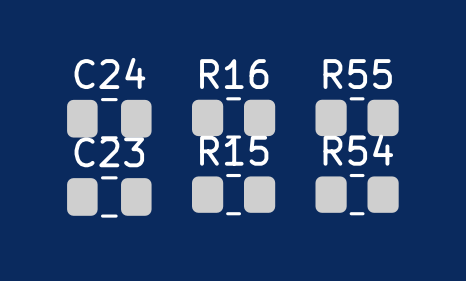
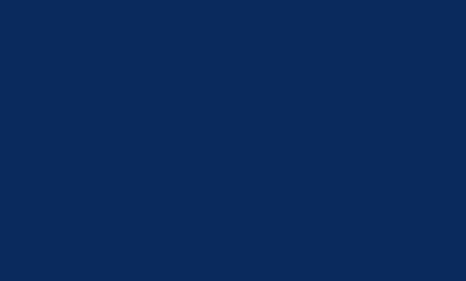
R16: (233, 117) -> none
R55: (357, 117) -> none
C24: (109, 118) -> none
R15: (233, 194) -> none
R54: (357, 194) -> none
C23: (109, 196) -> none

